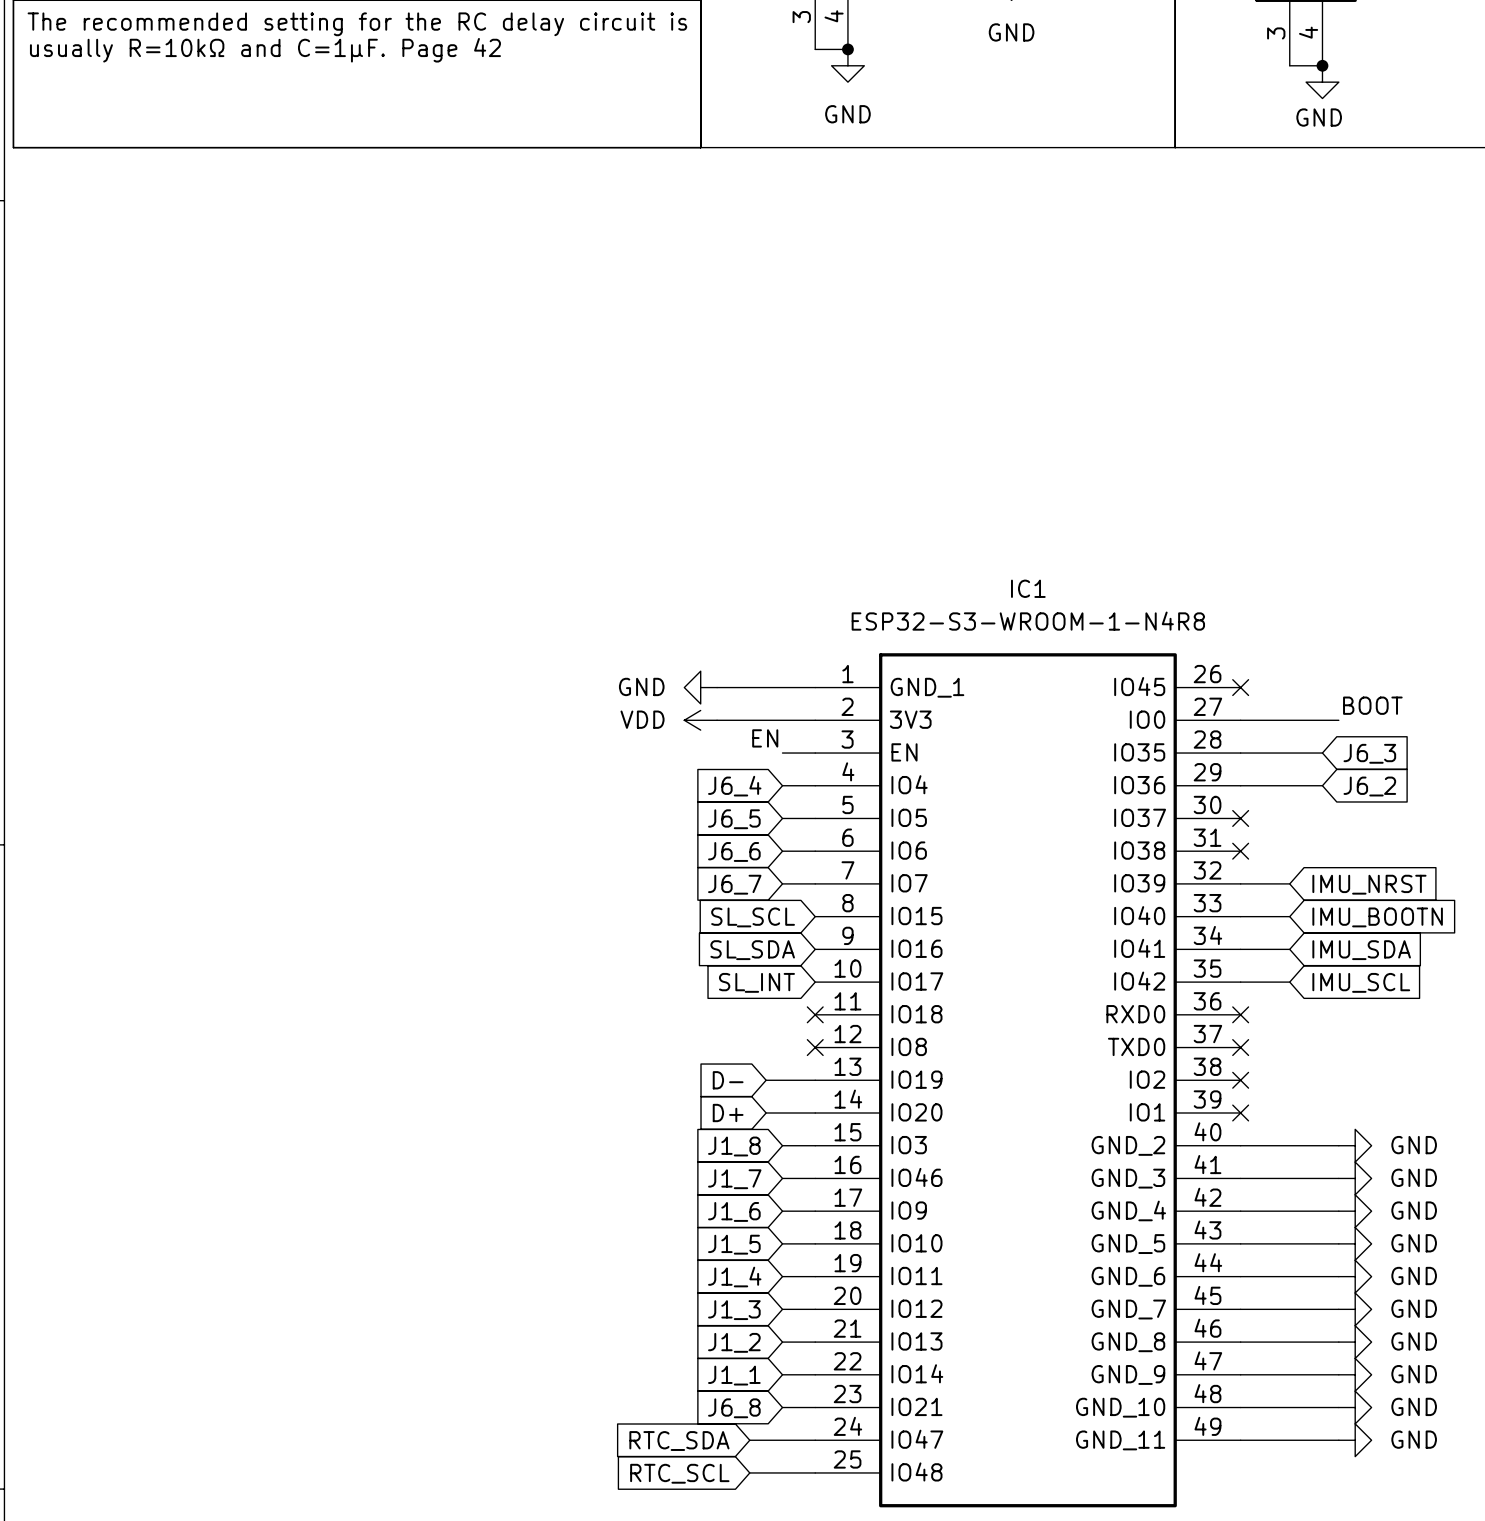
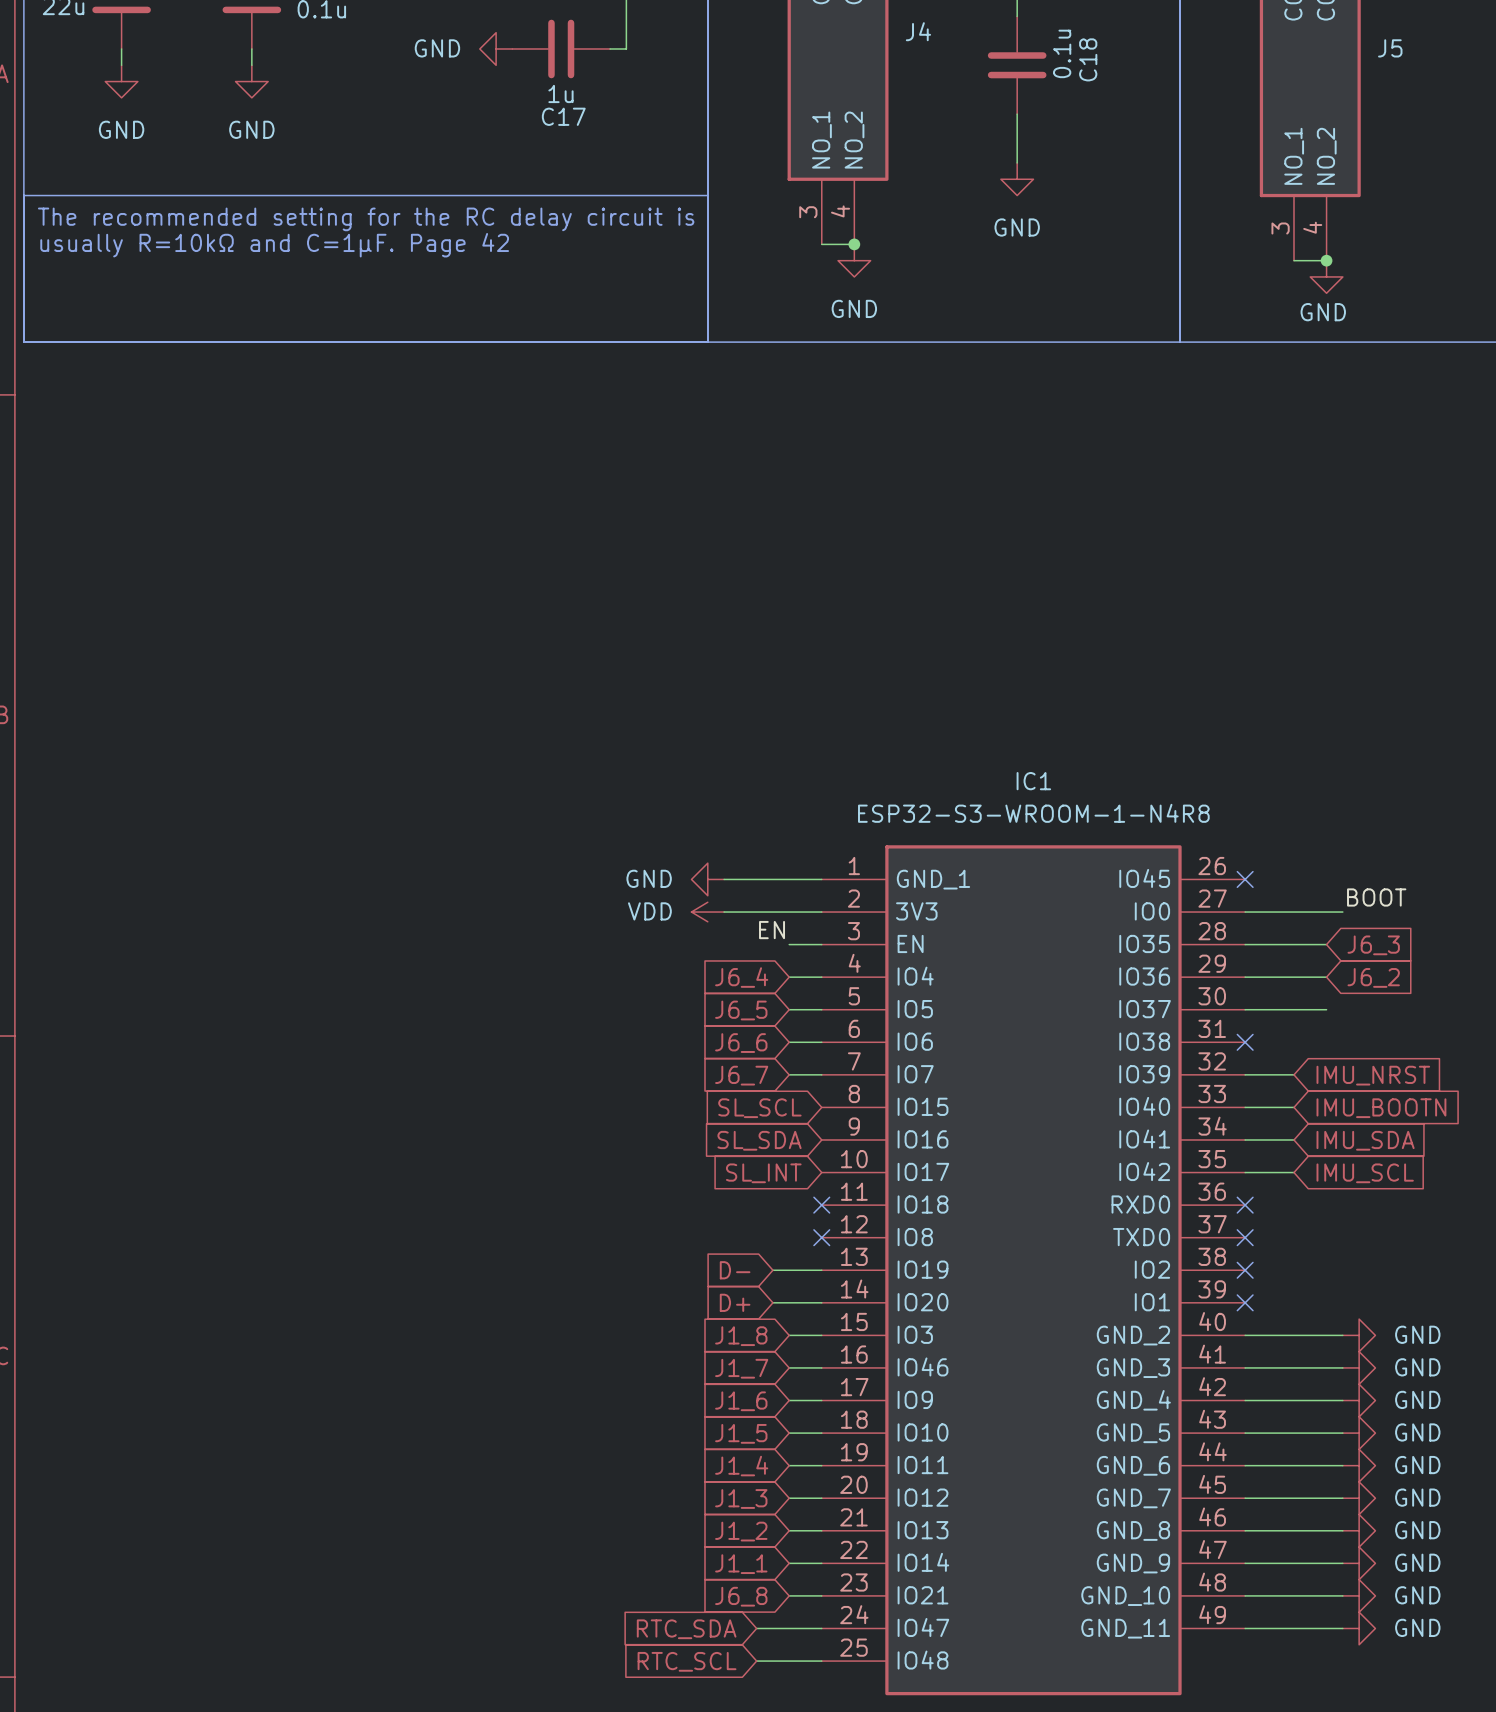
wire: none -> (1245, 1009) (1326, 1009)
no-connect mark: (1240, 818) -> none

